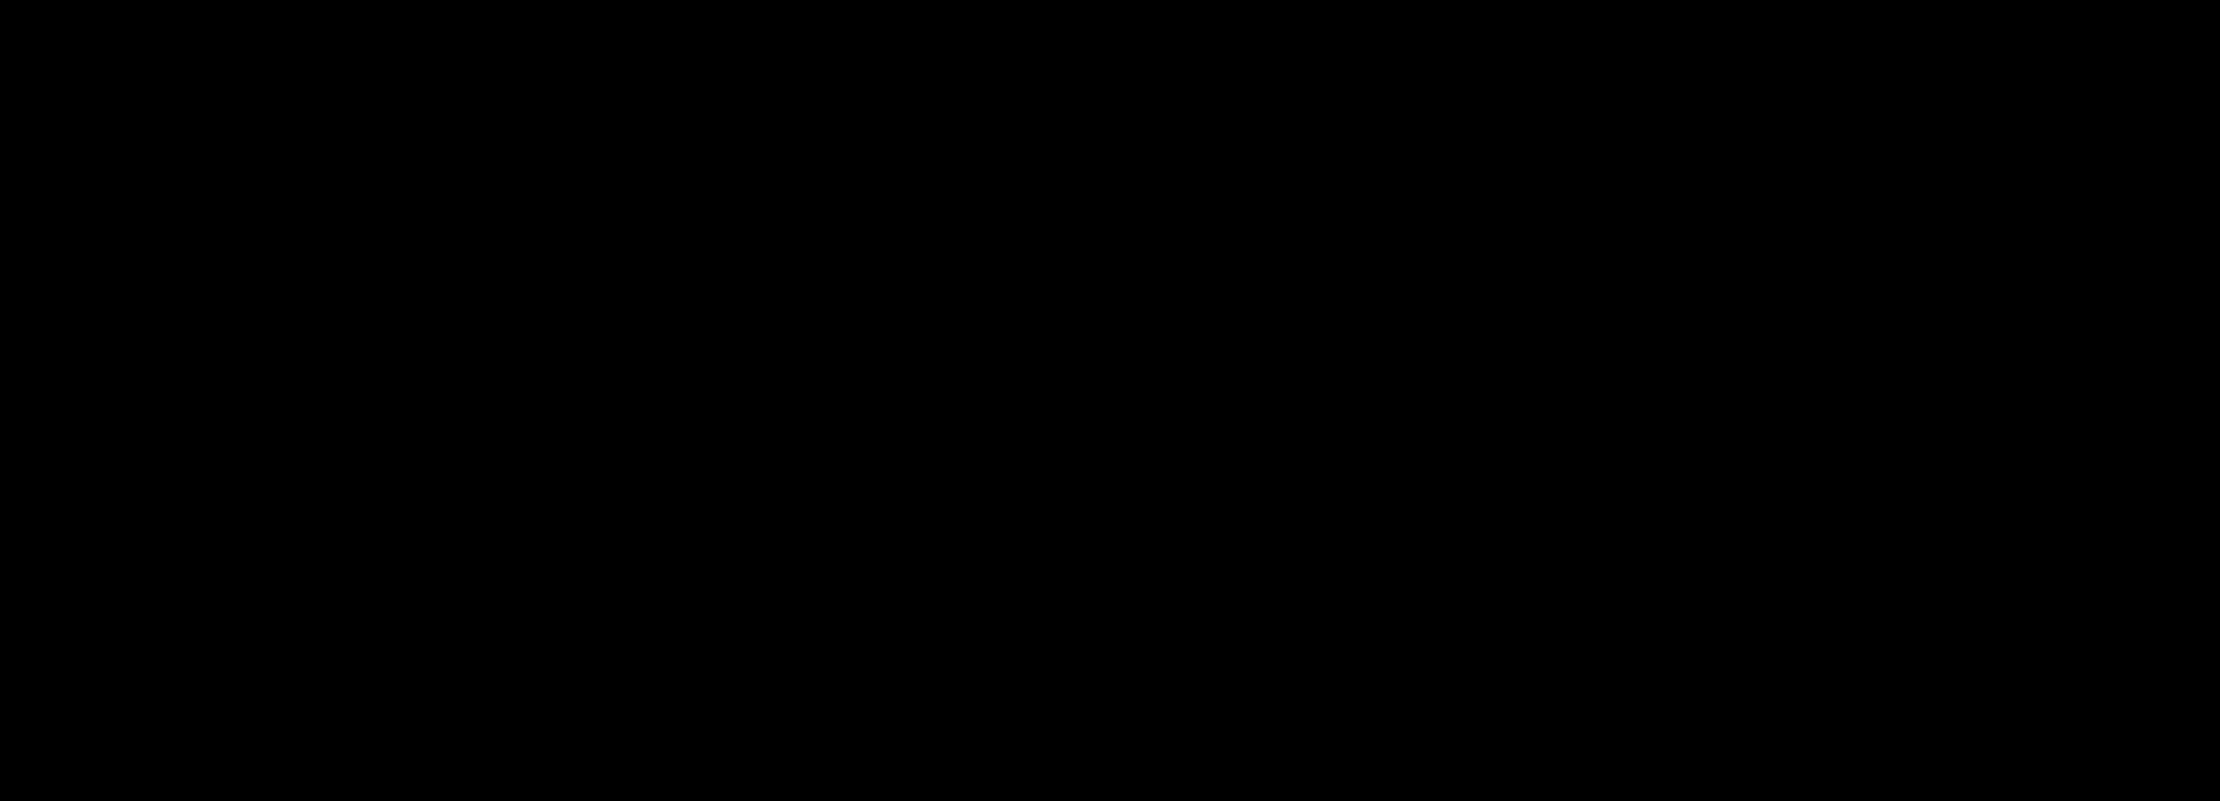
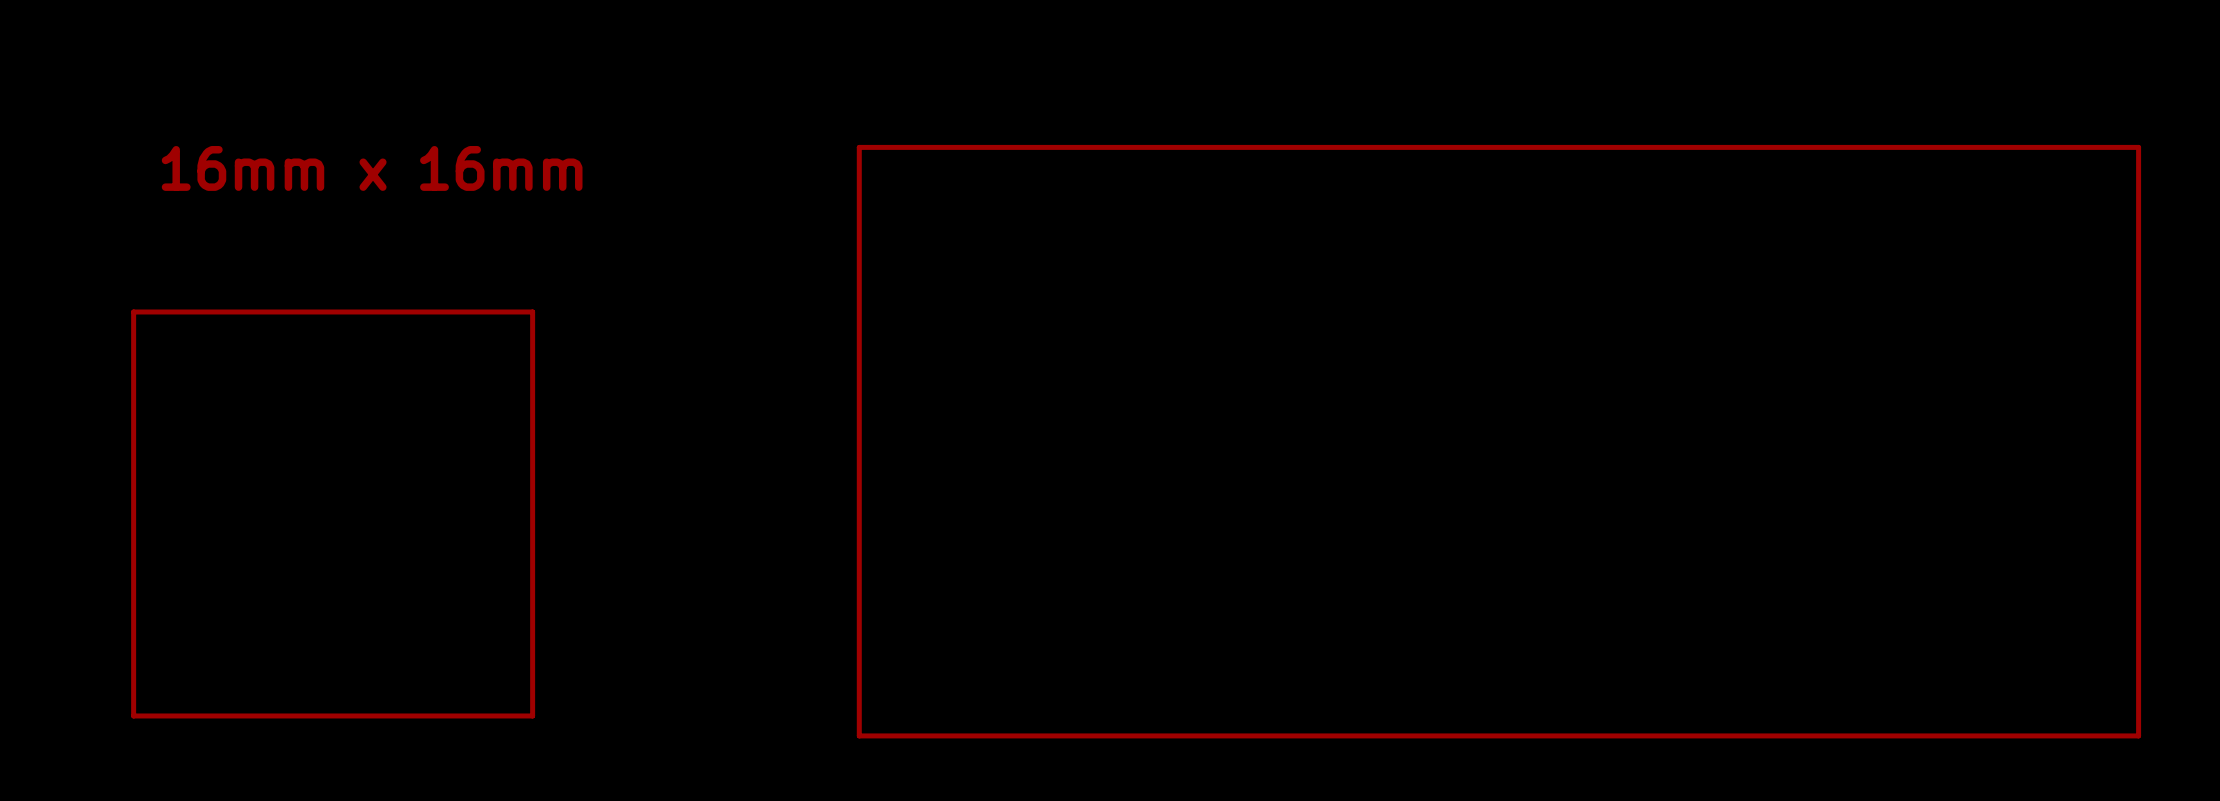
top track: none -> (859, 147) (2138, 147) (2138, 735) (859, 735) (859, 147)
text: none -> 16mm x 16mm (372, 168)
top track: none -> (133, 311) (532, 311) (532, 715) (133, 715) (133, 311)

